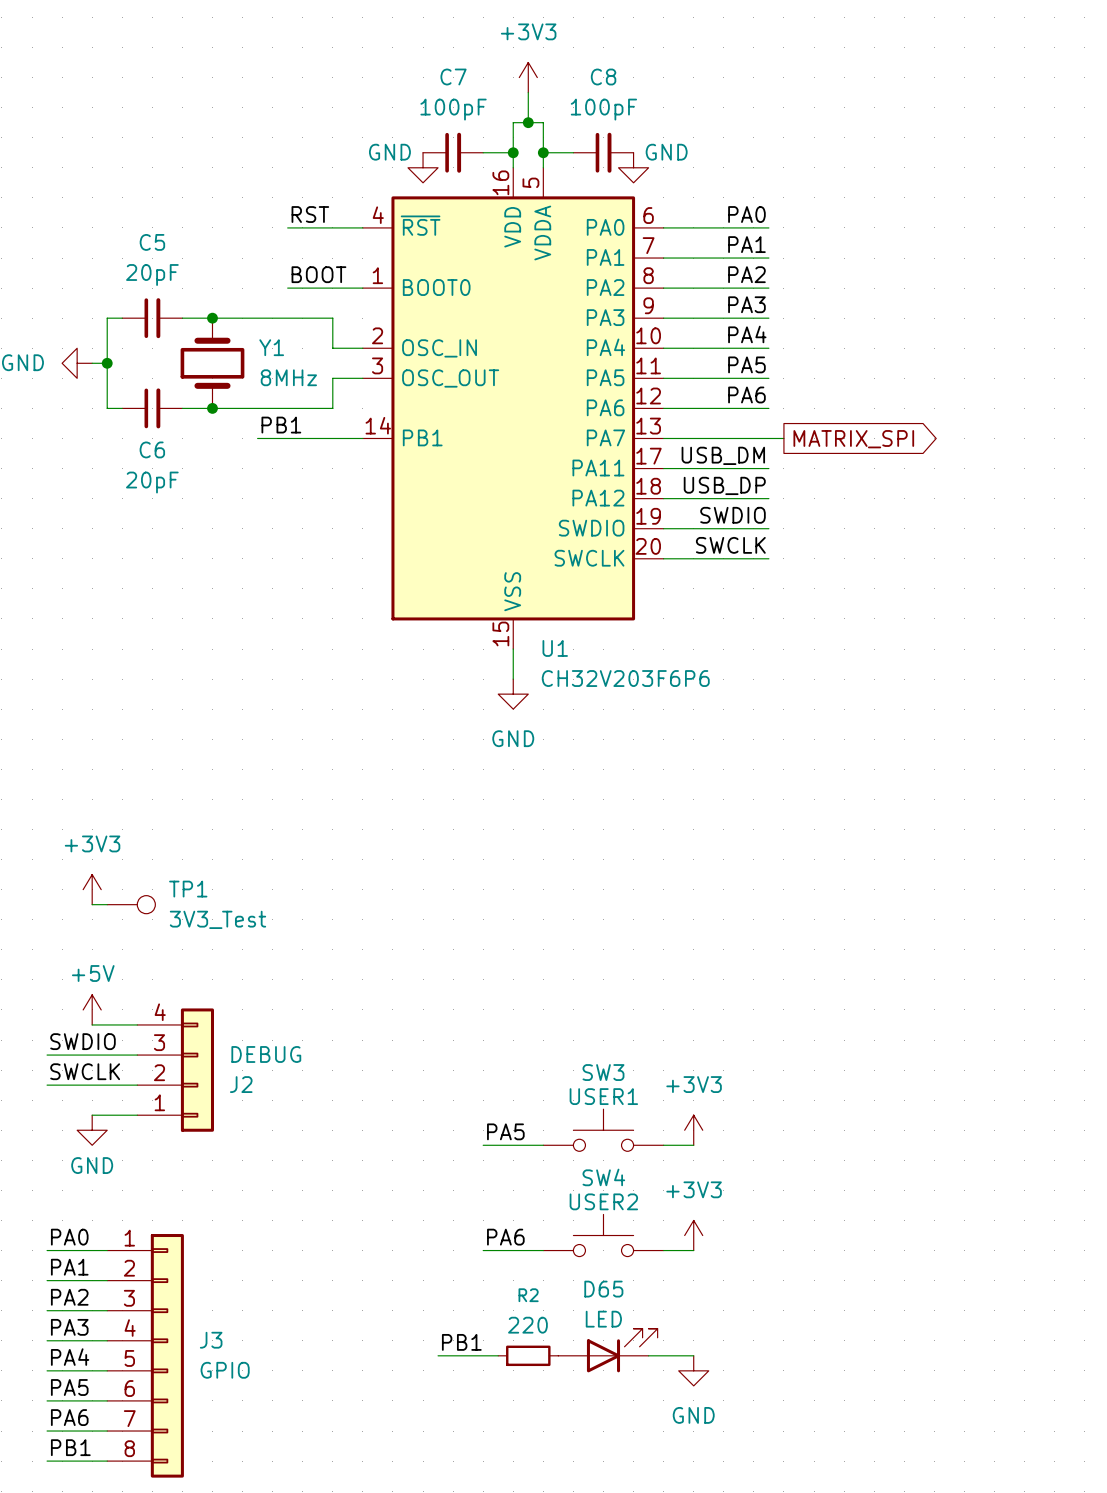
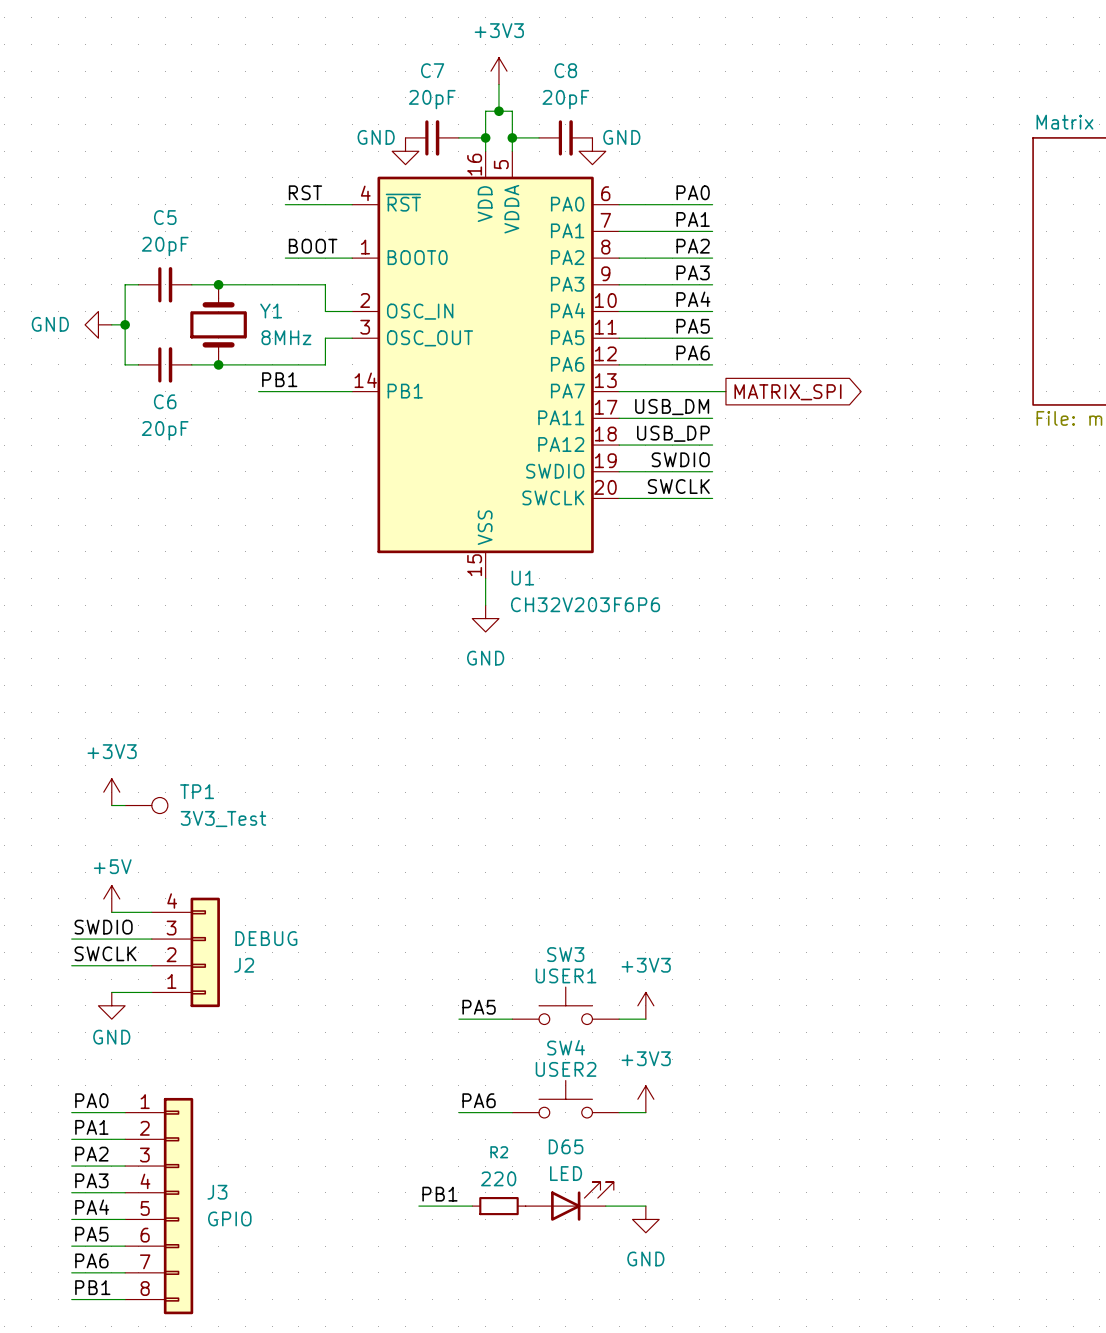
C7 value: 100pF (453, 109) -> 20pF (432, 99)
C8 value: 100pF (603, 109) -> 20pF (565, 99)

